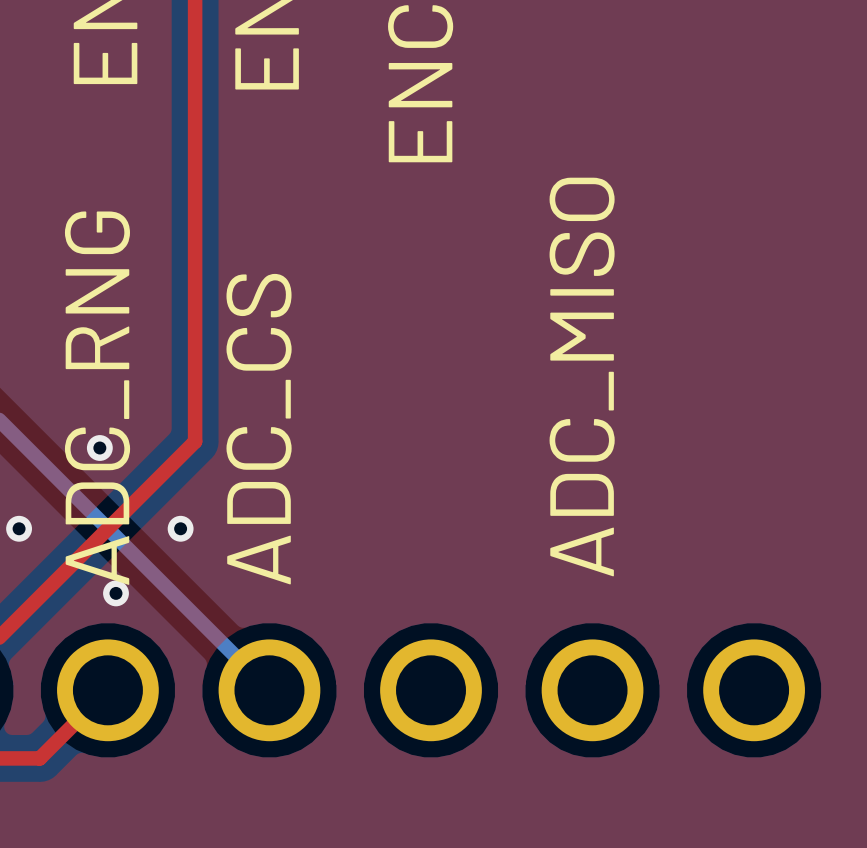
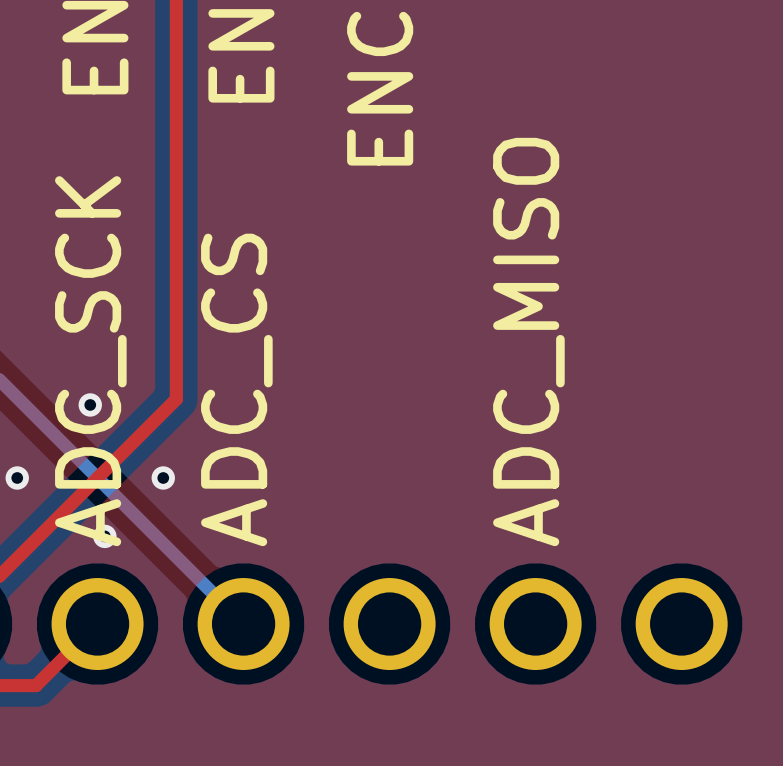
text: ADC_RNG (97, 398) -> ADC_SCK (90, 361)

